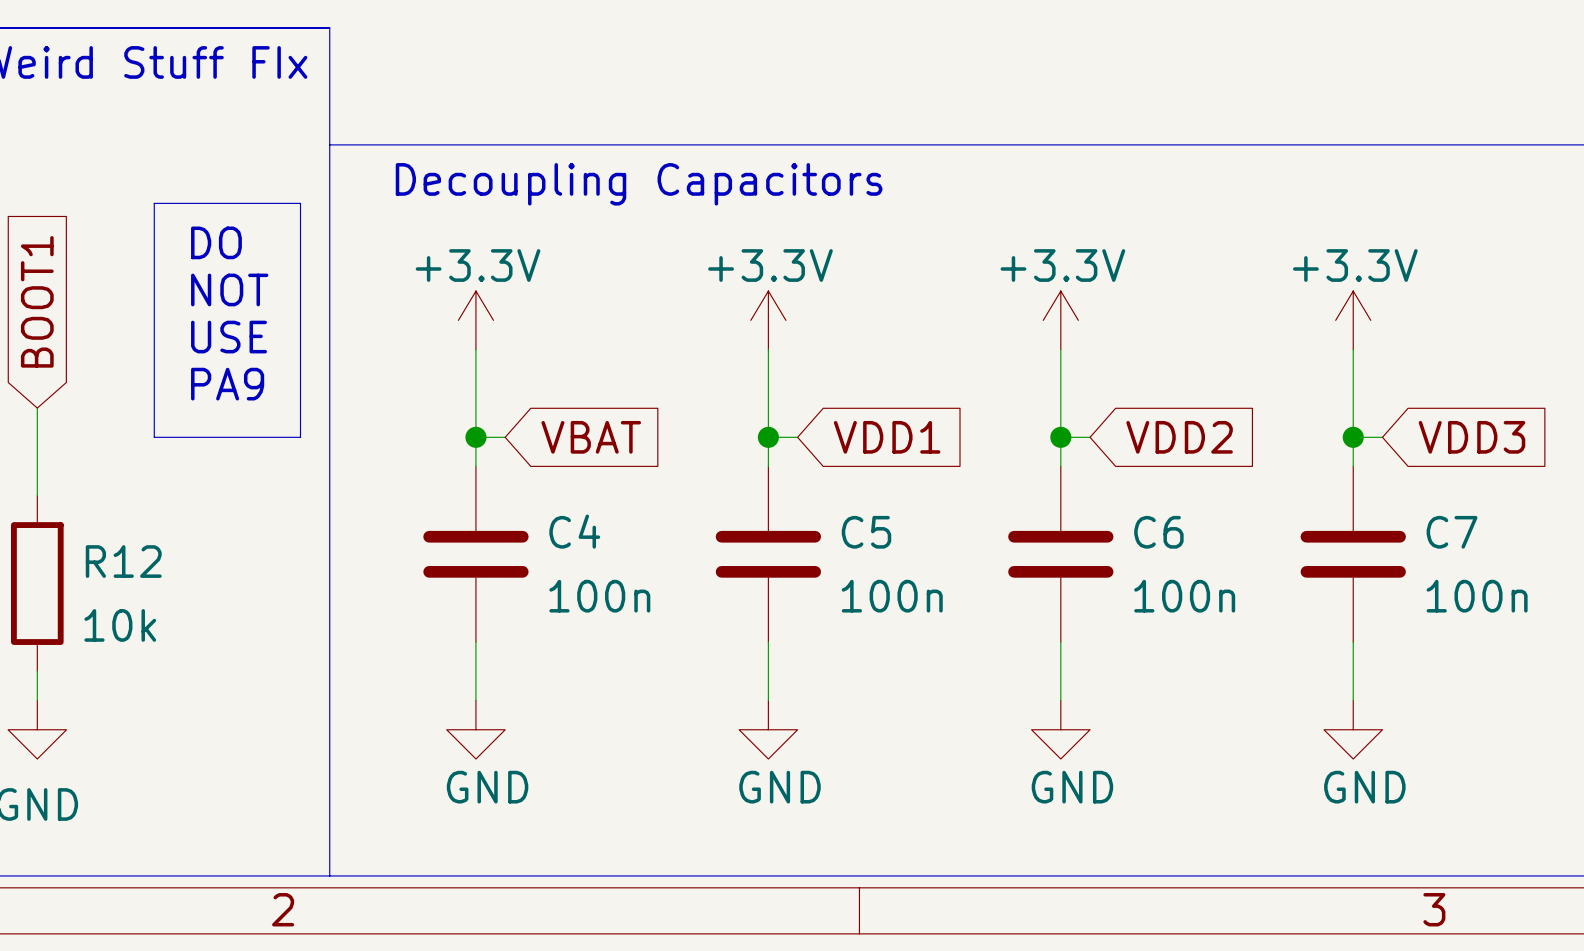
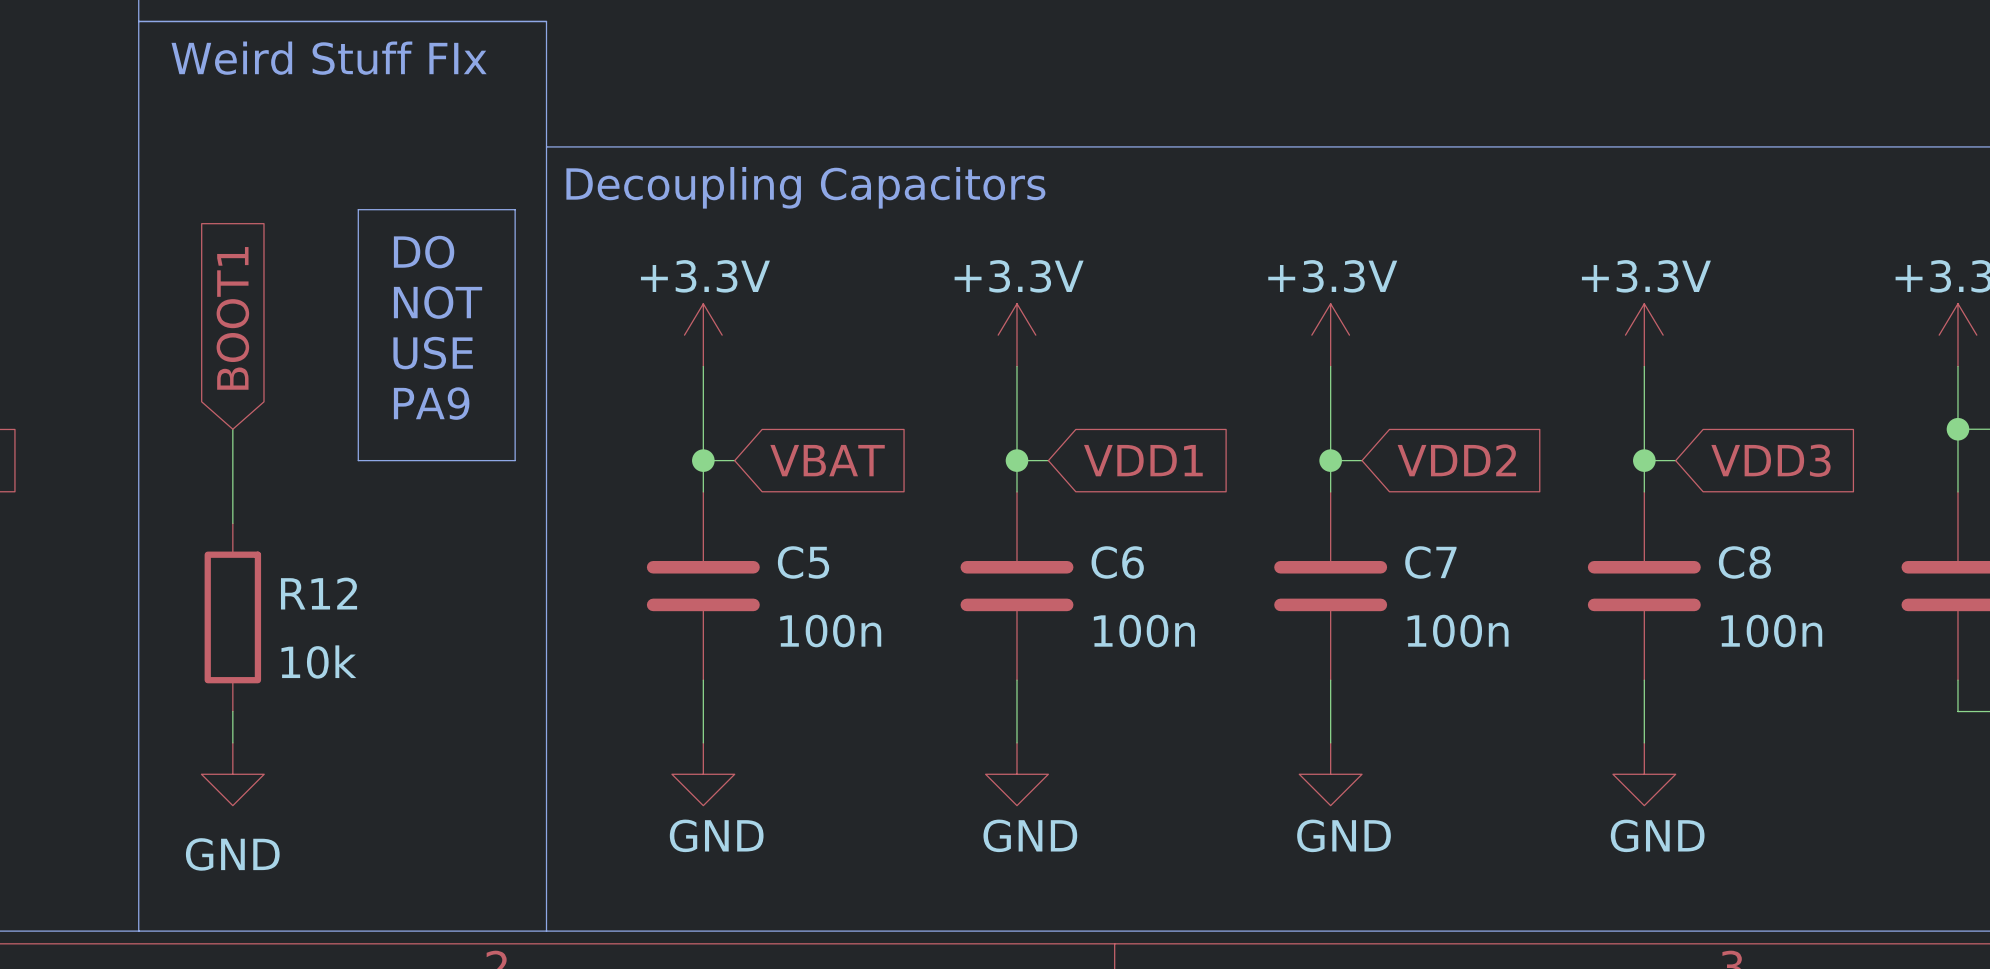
text position: Decoupling Capacitors (639, 184) -> Decoupling Capacitors (805, 187)
C4 name: C4 (574, 531) -> C5 (803, 562)
C5 name: C5 (866, 532) -> C6 (1117, 562)
C6 name: C6 (1158, 532) -> C7 (1430, 562)
C7 name: C7 (1452, 532) -> C8 (1744, 562)

